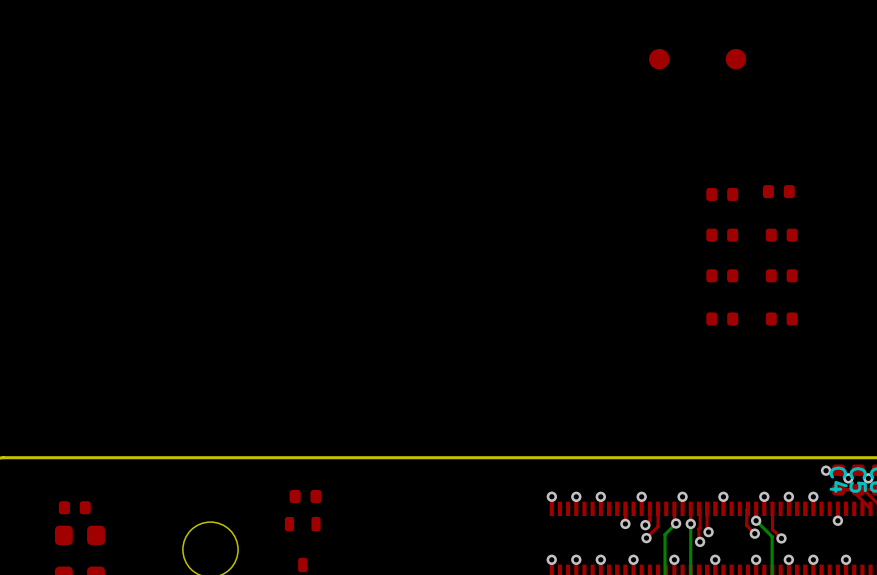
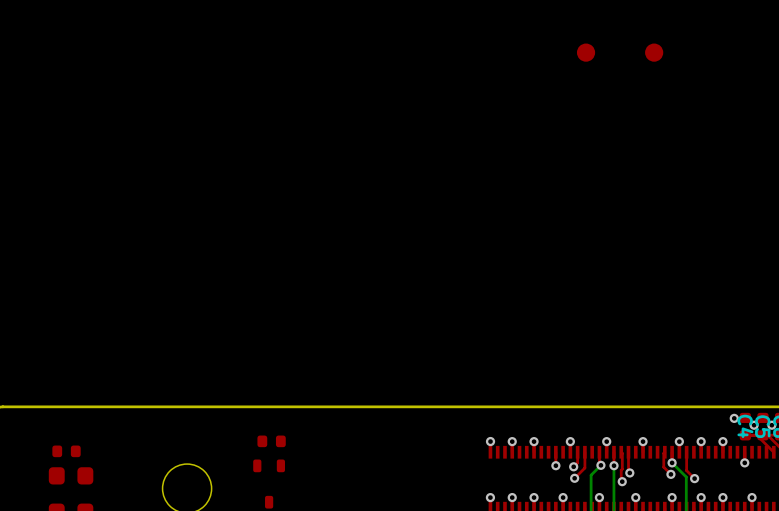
part: (778, 191) -> none
part: (722, 194) -> none
part: (722, 235) -> none
part: (781, 235) -> none
part: (722, 275) -> none
part: (781, 275) -> none
part: (722, 318) -> none
part: (781, 318) -> none

